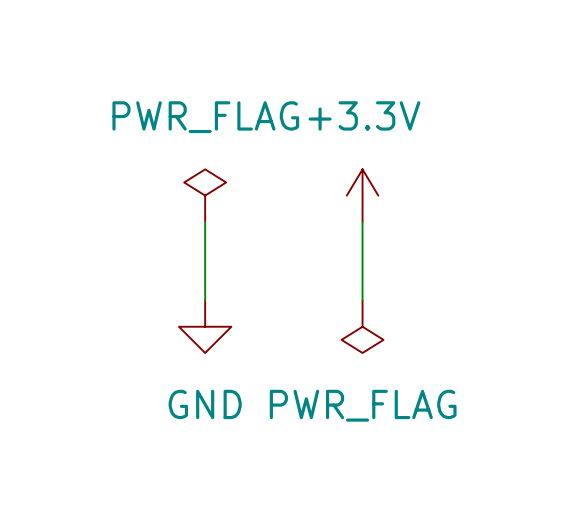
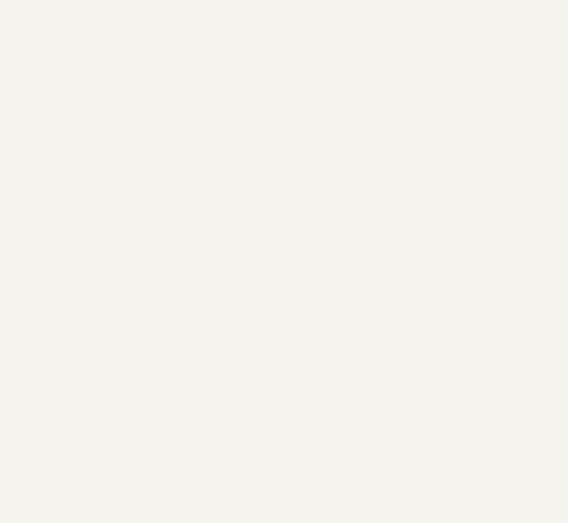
power symbol: PWR_FLAG (205, 195) -> none
power symbol: +3.3V (362, 195) -> none
wire: (205, 221) (205, 300) -> none
wire: (362, 221) (362, 300) -> none
power symbol: GND (205, 326) -> none
power symbol: PWR_FLAG (362, 326) -> none

